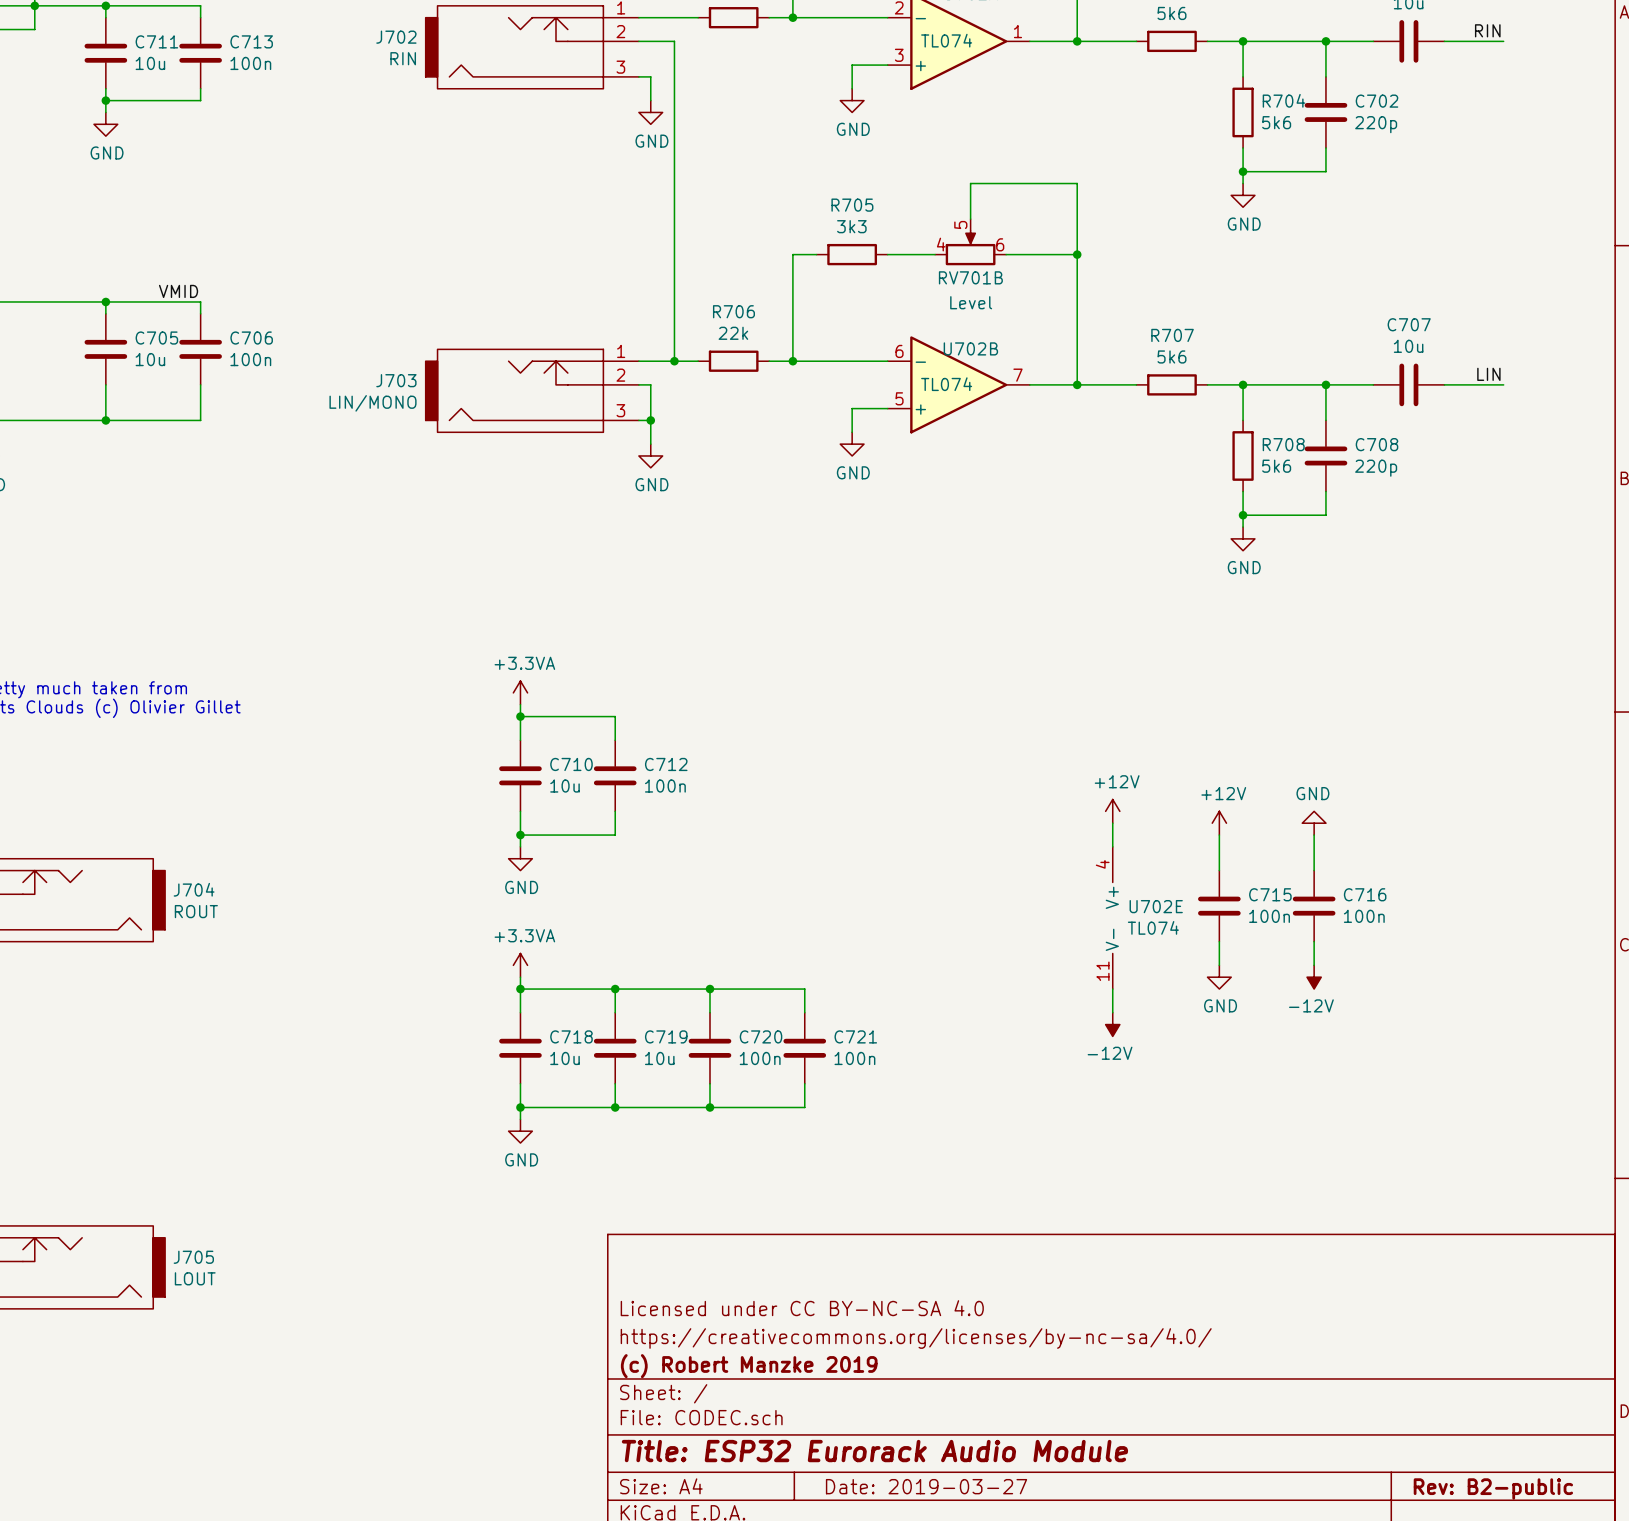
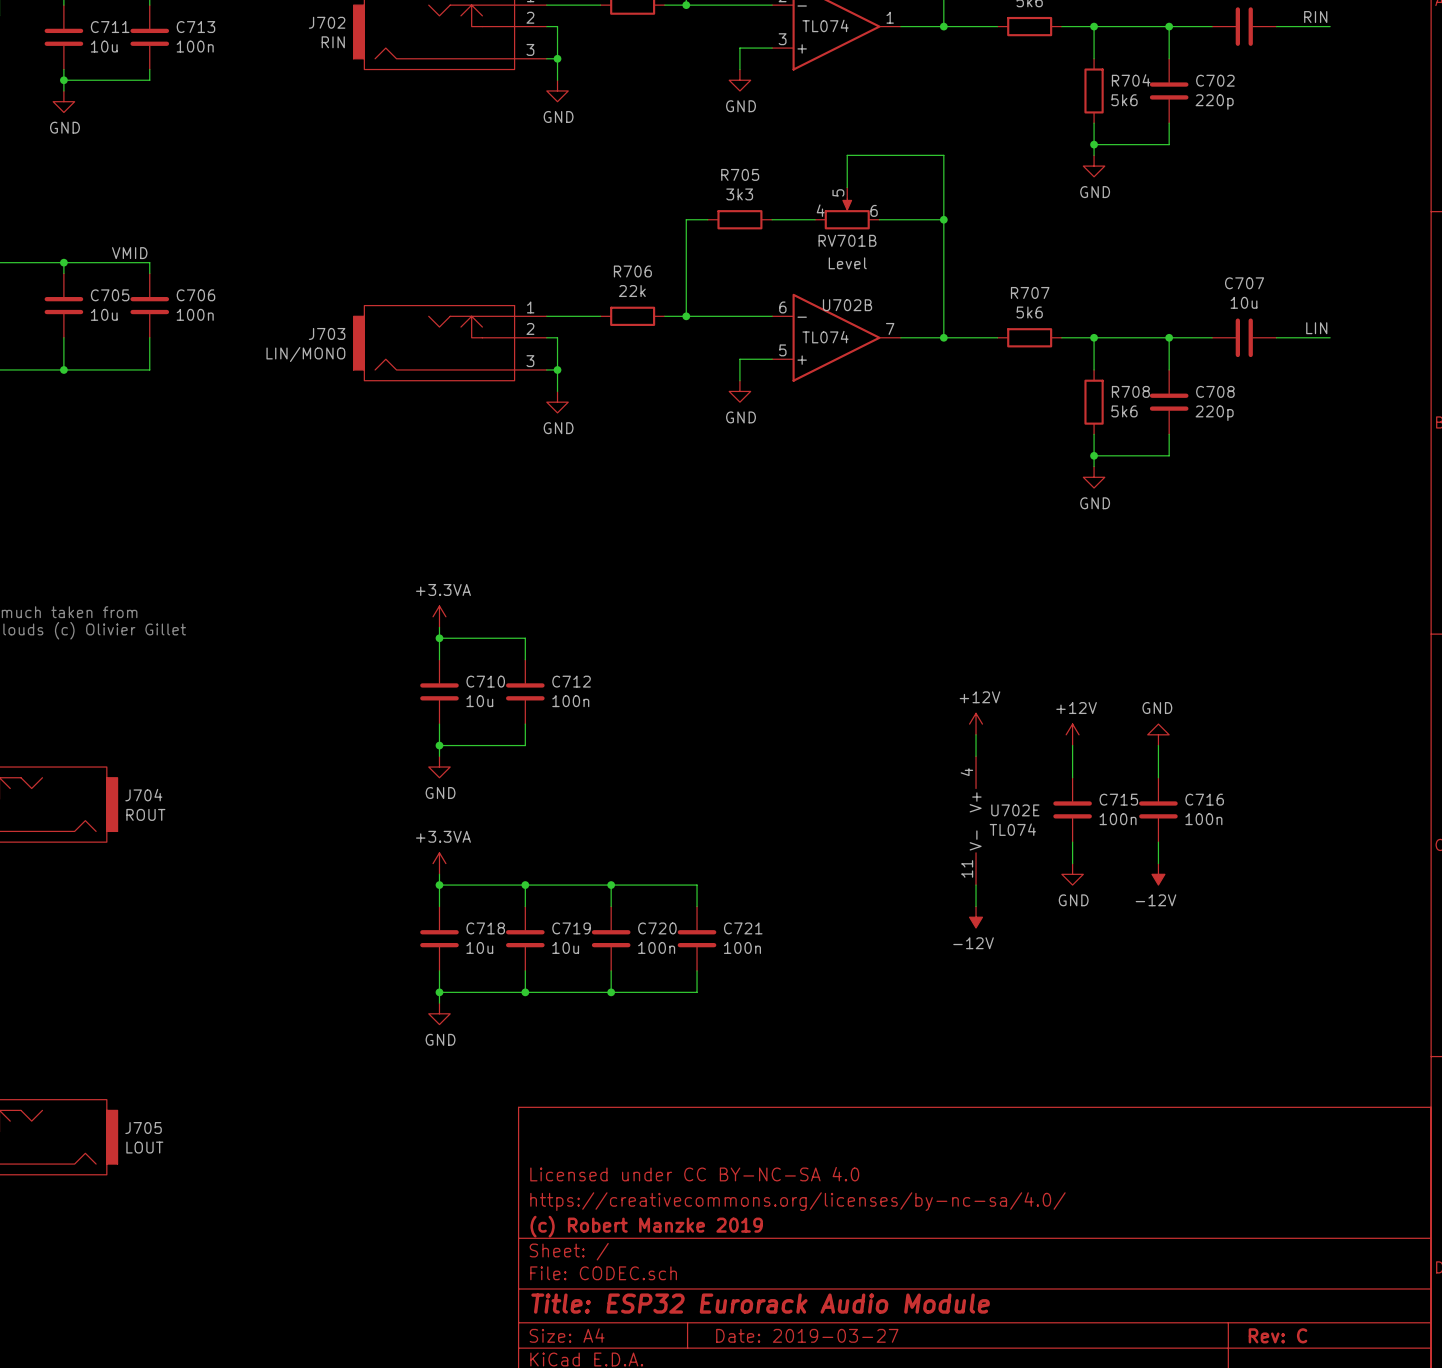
wire: (650, 41) (674, 41) (674, 361) -> (557, 26) (557, 58)
junction: none -> (557, 58)
junction: (674, 361) -> none
title block: Rev: B2-public (1493, 1488) -> Rev: C (1277, 1335)

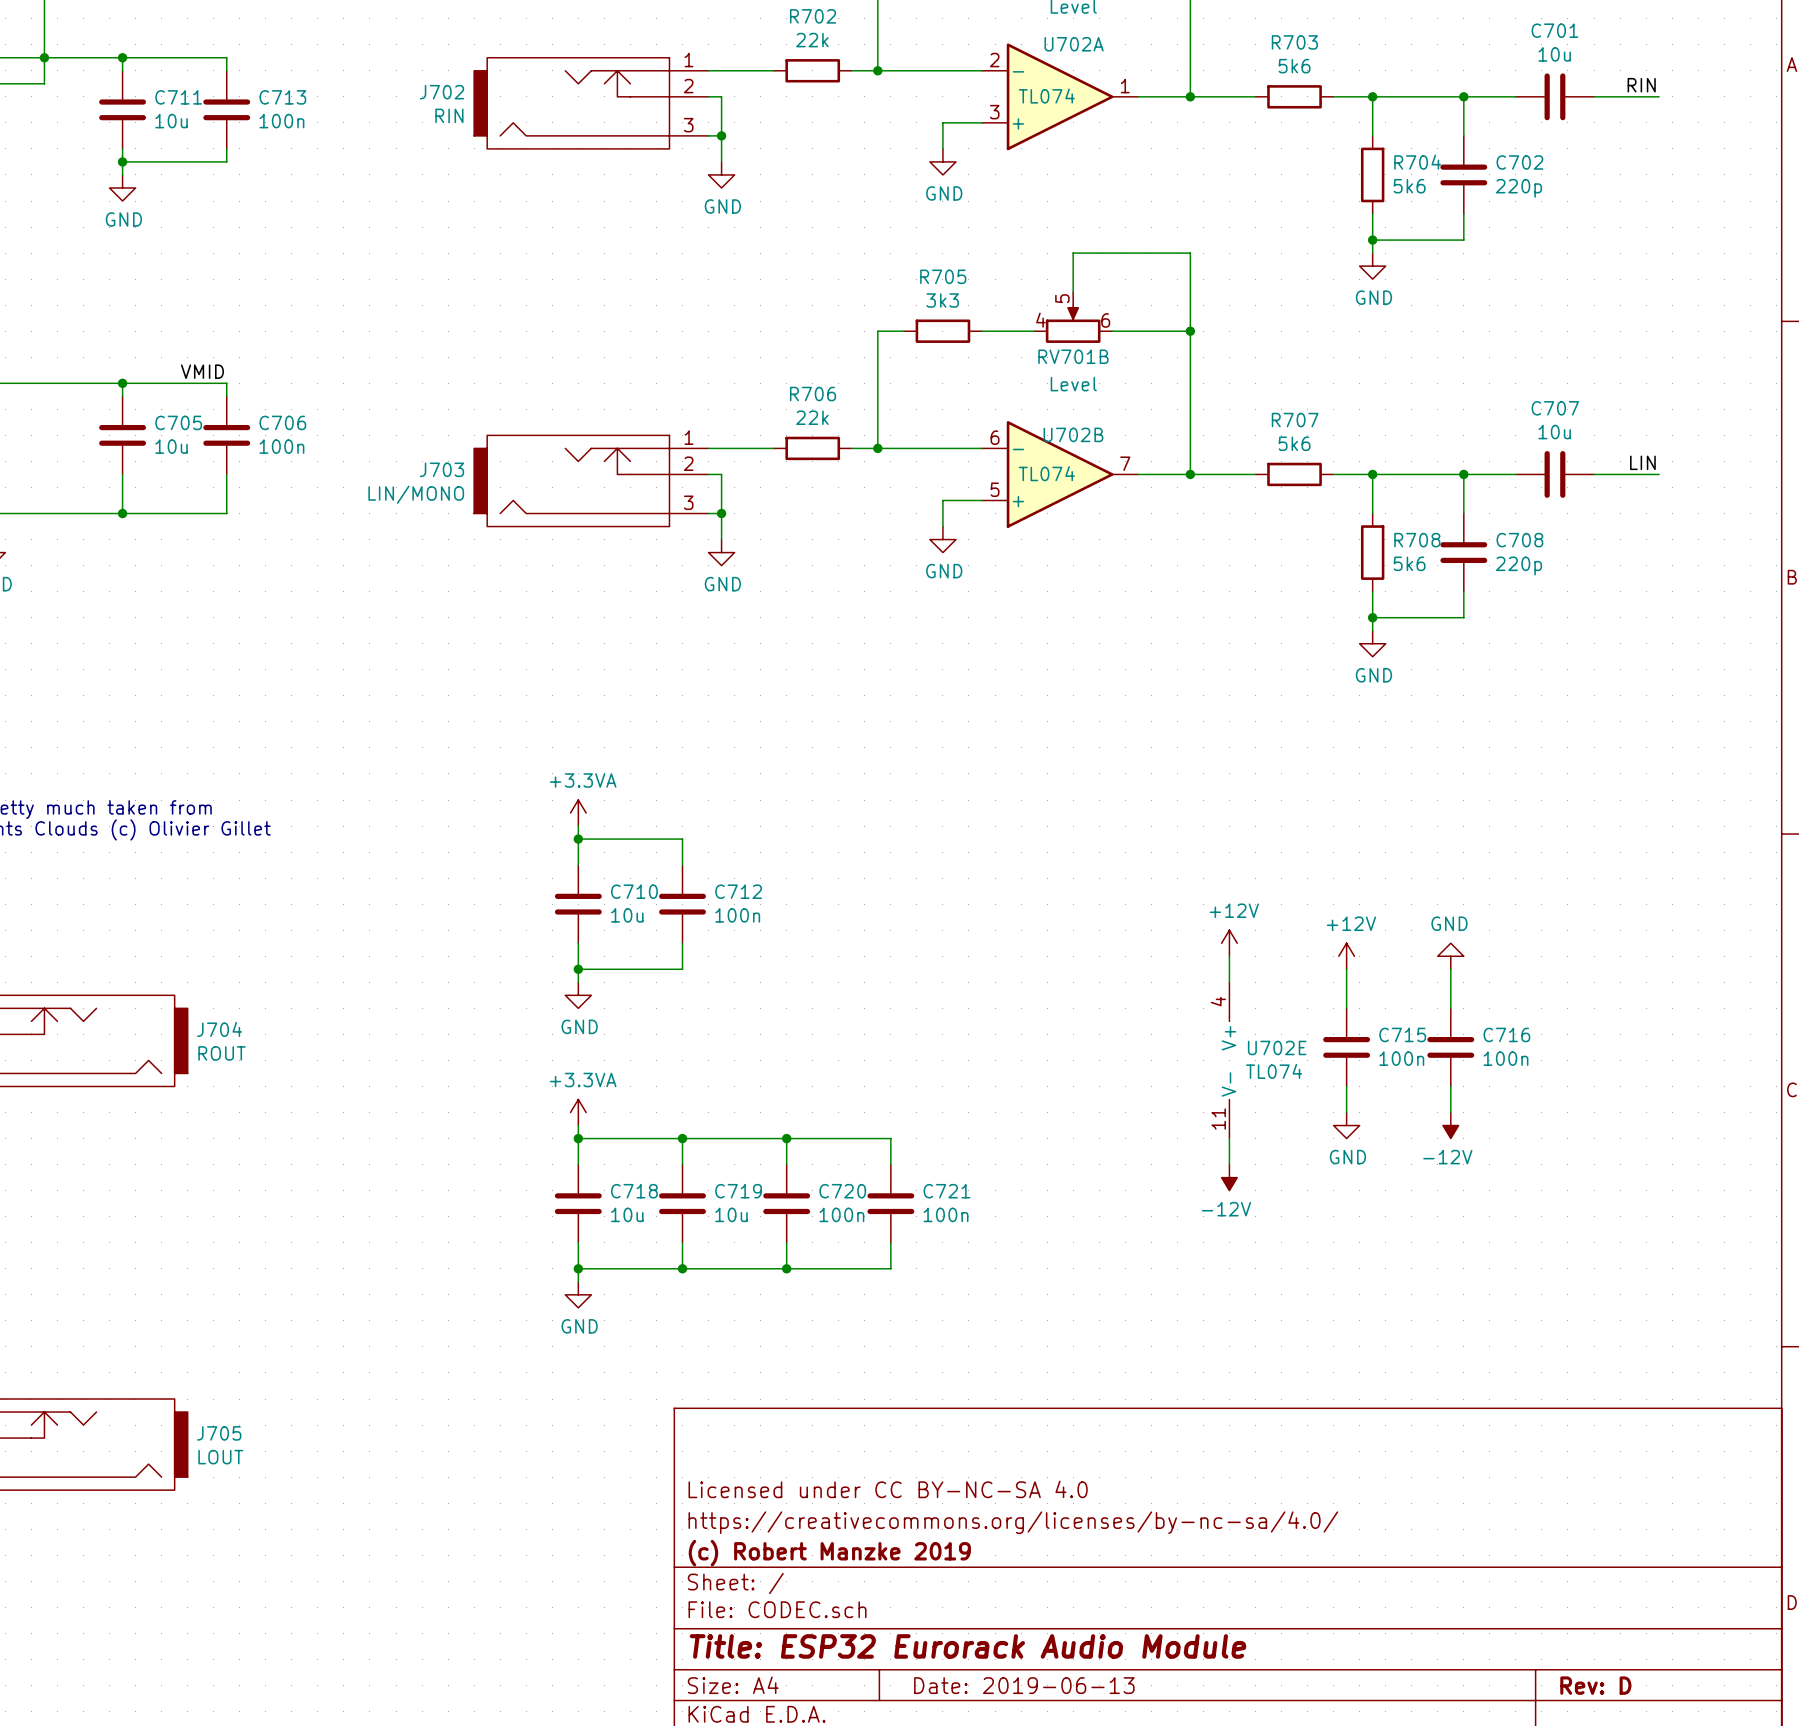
title block: Date: 2019-03-27 (807, 1335) -> Date: 2019-06-13 (1024, 1685)
title block: Rev: C (1277, 1335) -> Rev: D (1595, 1685)

